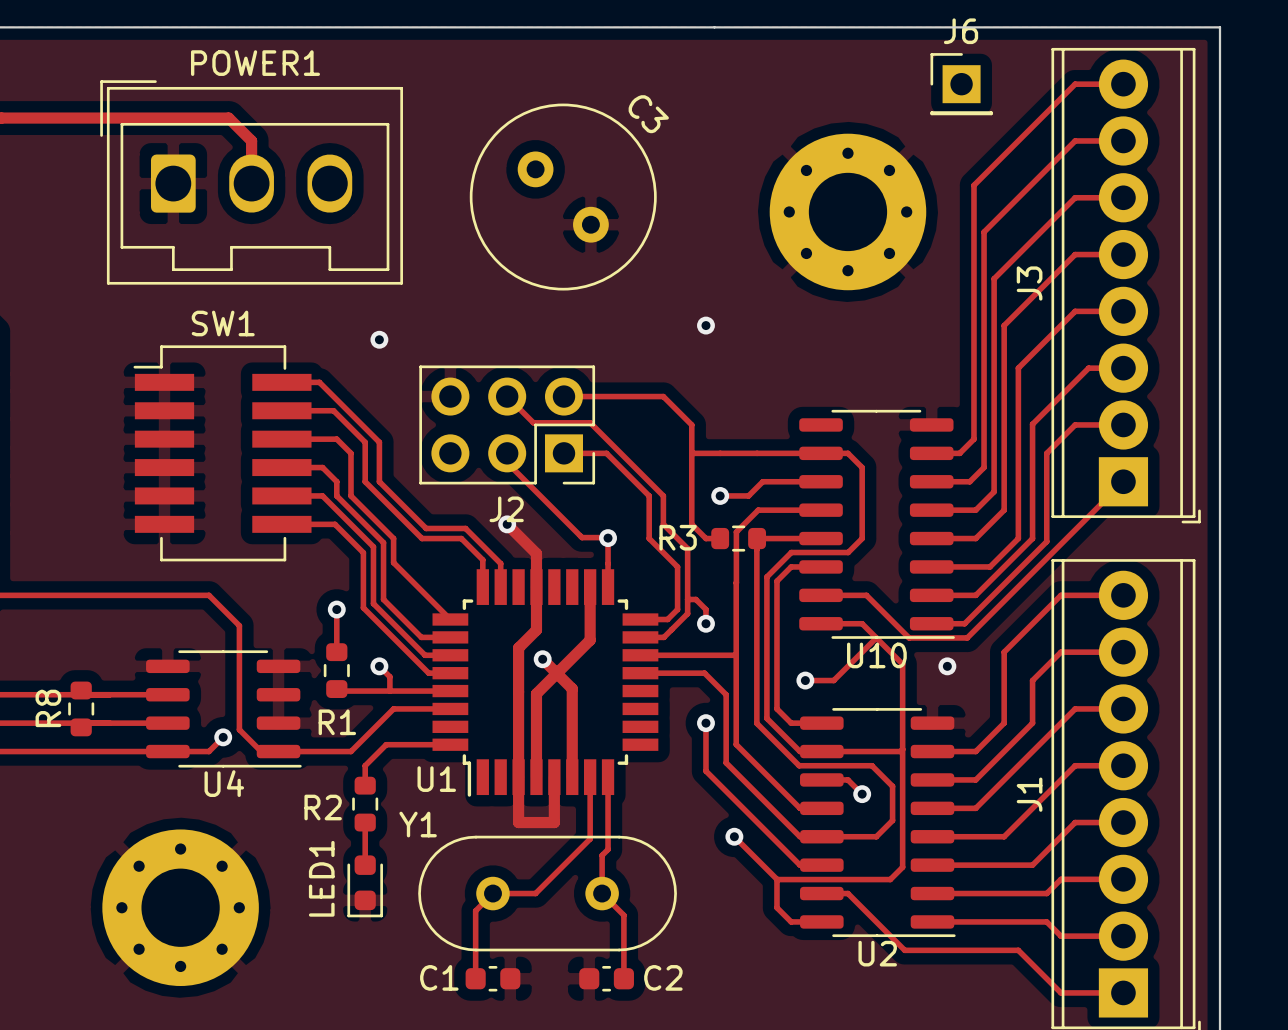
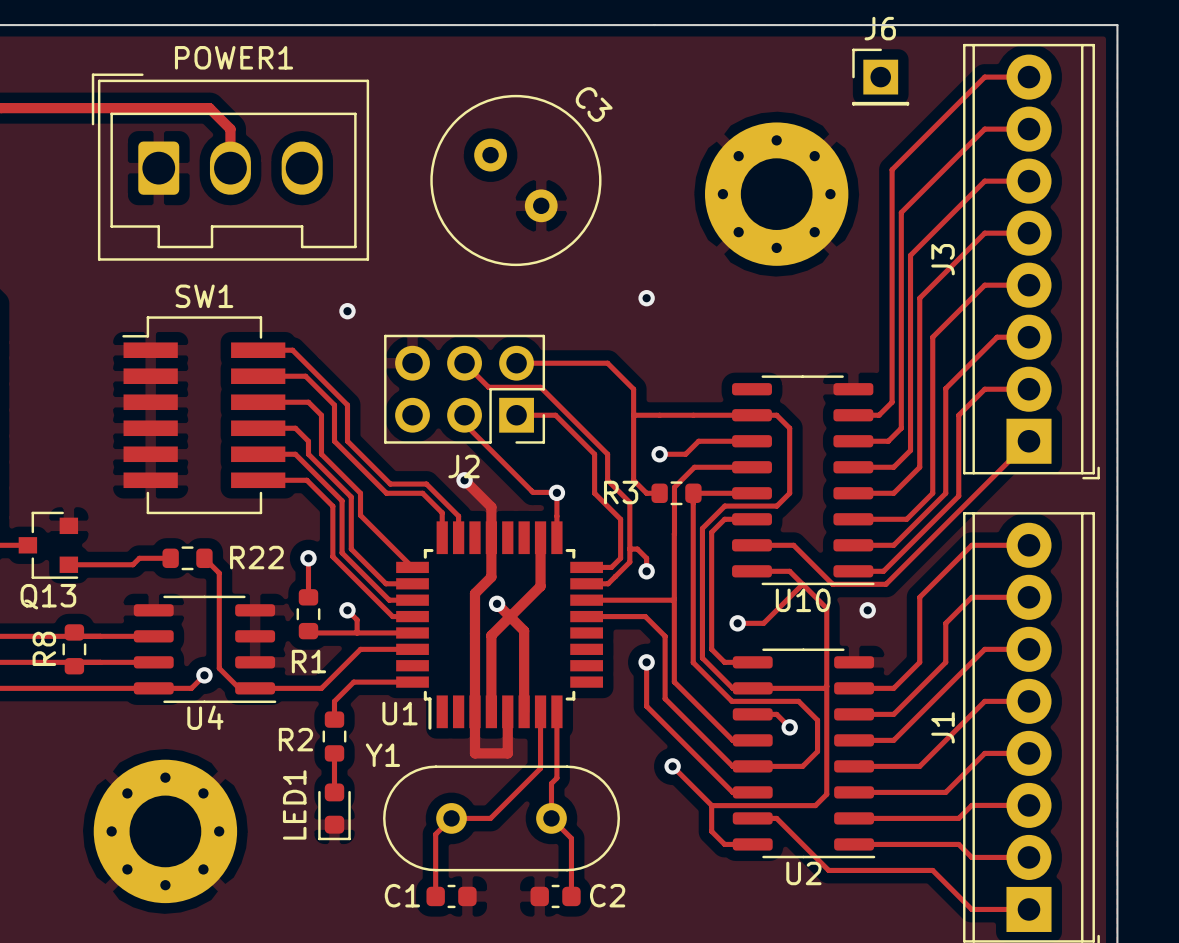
track: (30, 595) (209, 595) (223, 609) -> none
Q13: none -> (48, 545)
track: none -> (170, 558) (139, 558) (132, 564) (68, 564)
R22: none -> (187, 558)

